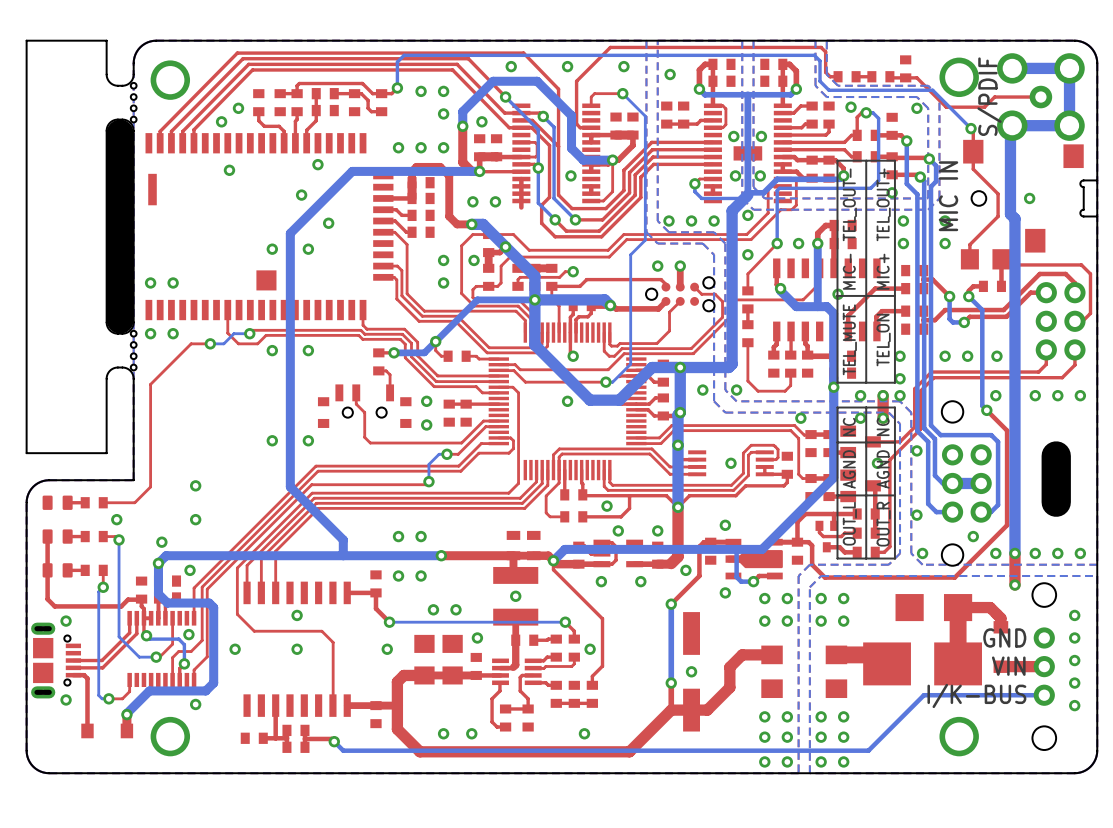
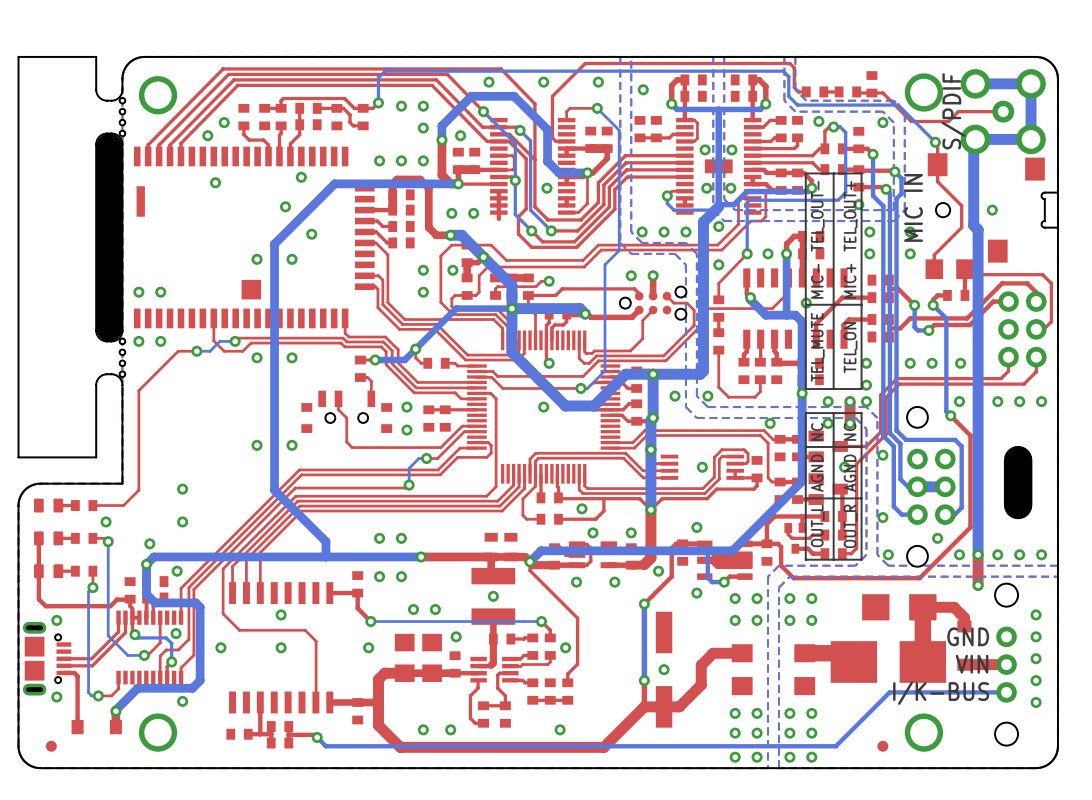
part: none -> (51, 746)
part: none -> (882, 746)

